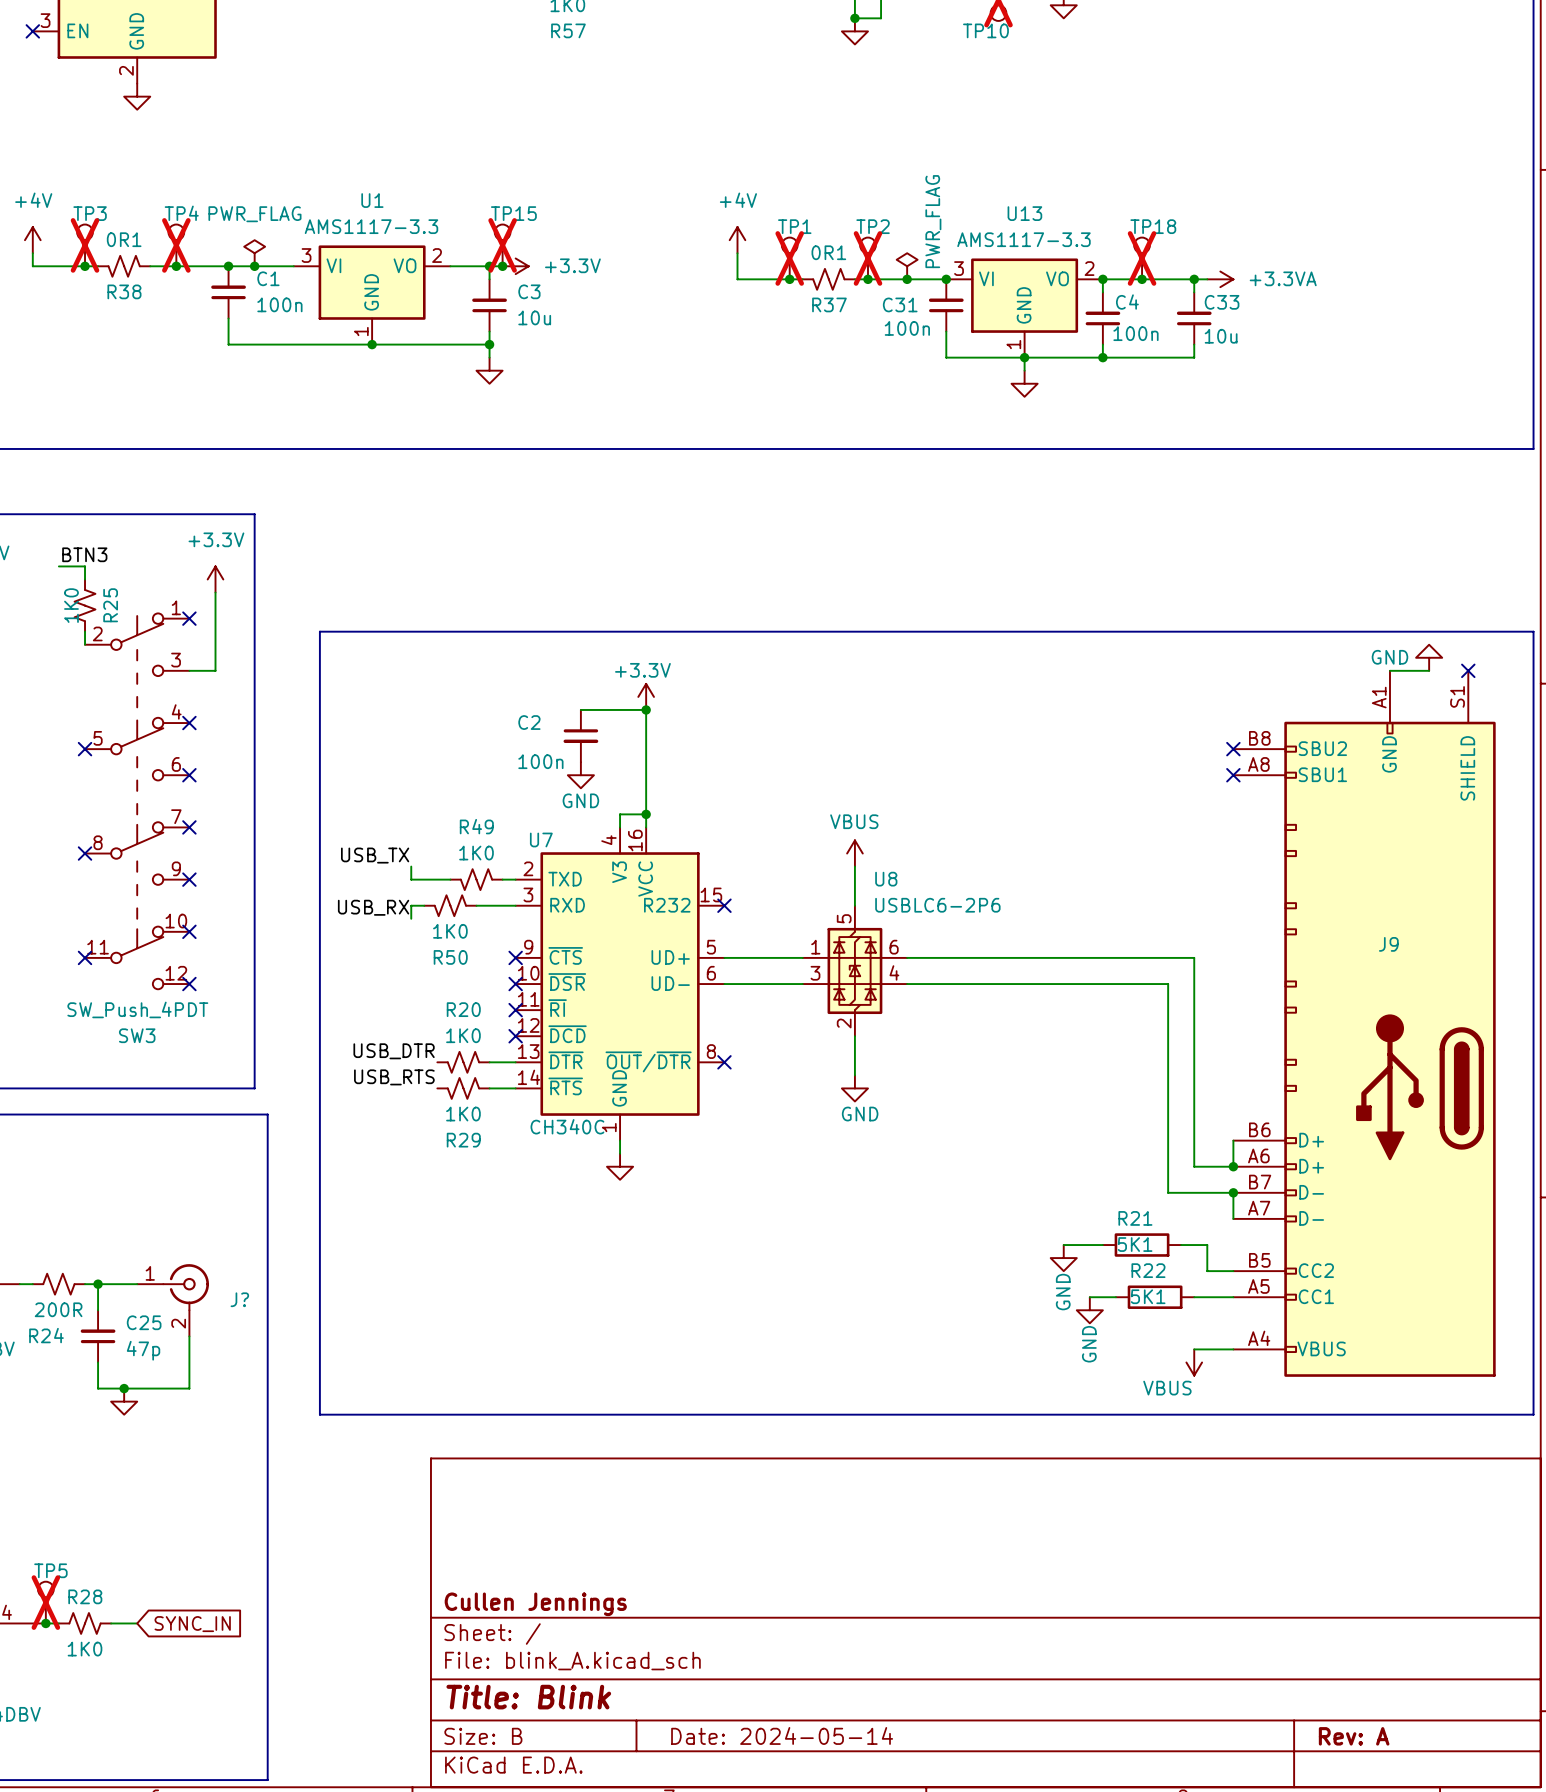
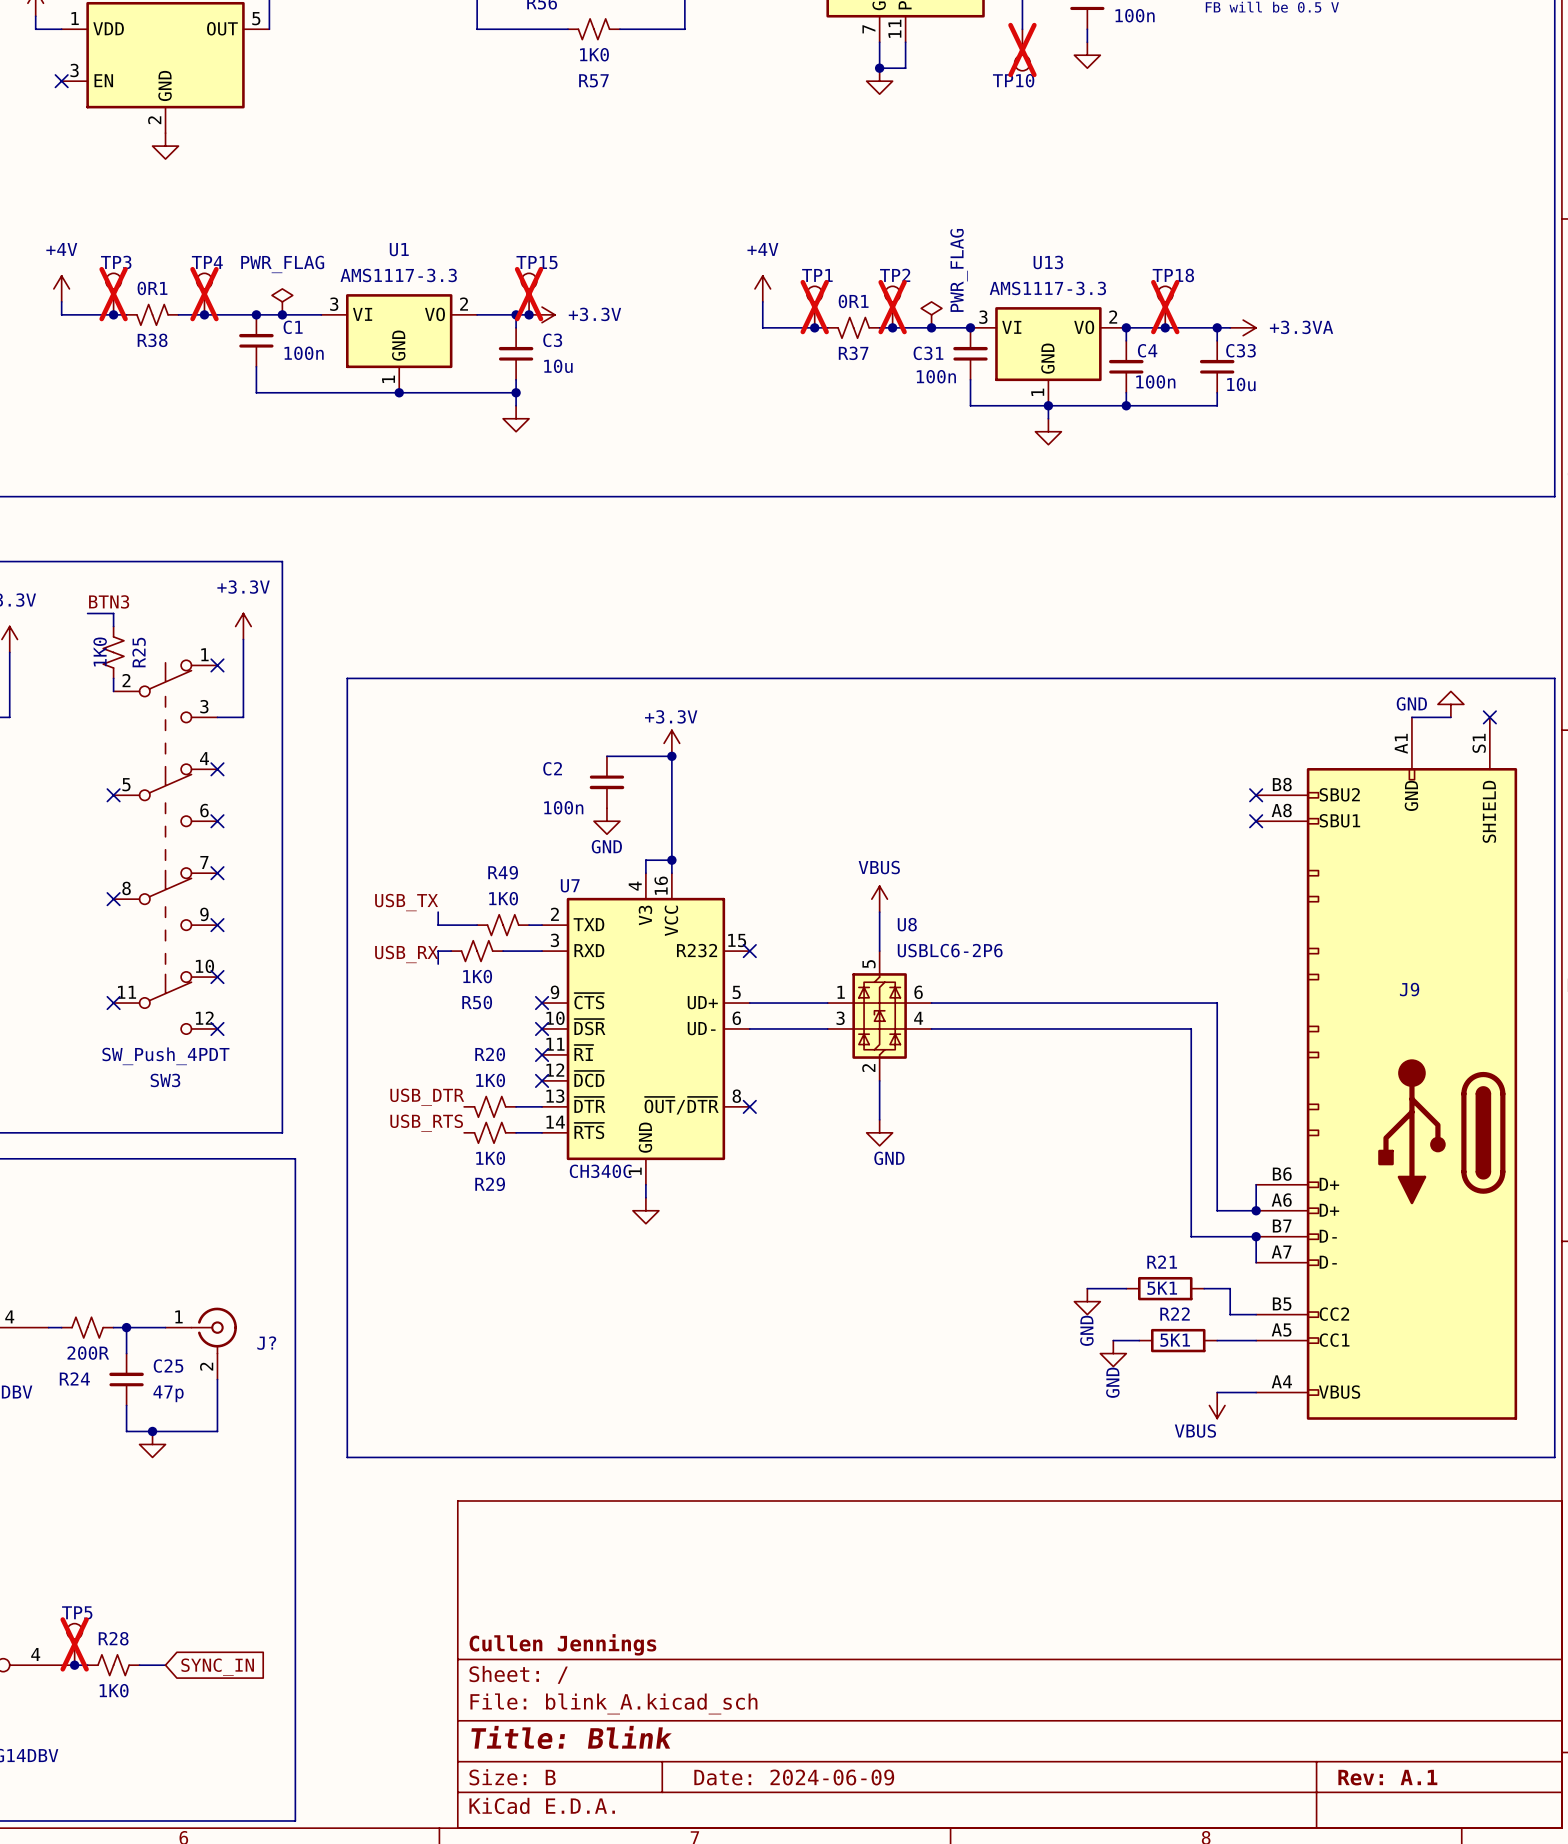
title block: Date: 2024-05-14 (782, 1735) -> Date: 2024-06-09 (794, 1777)
title block: Rev: A (1354, 1736) -> Rev: A.1 (1387, 1777)

